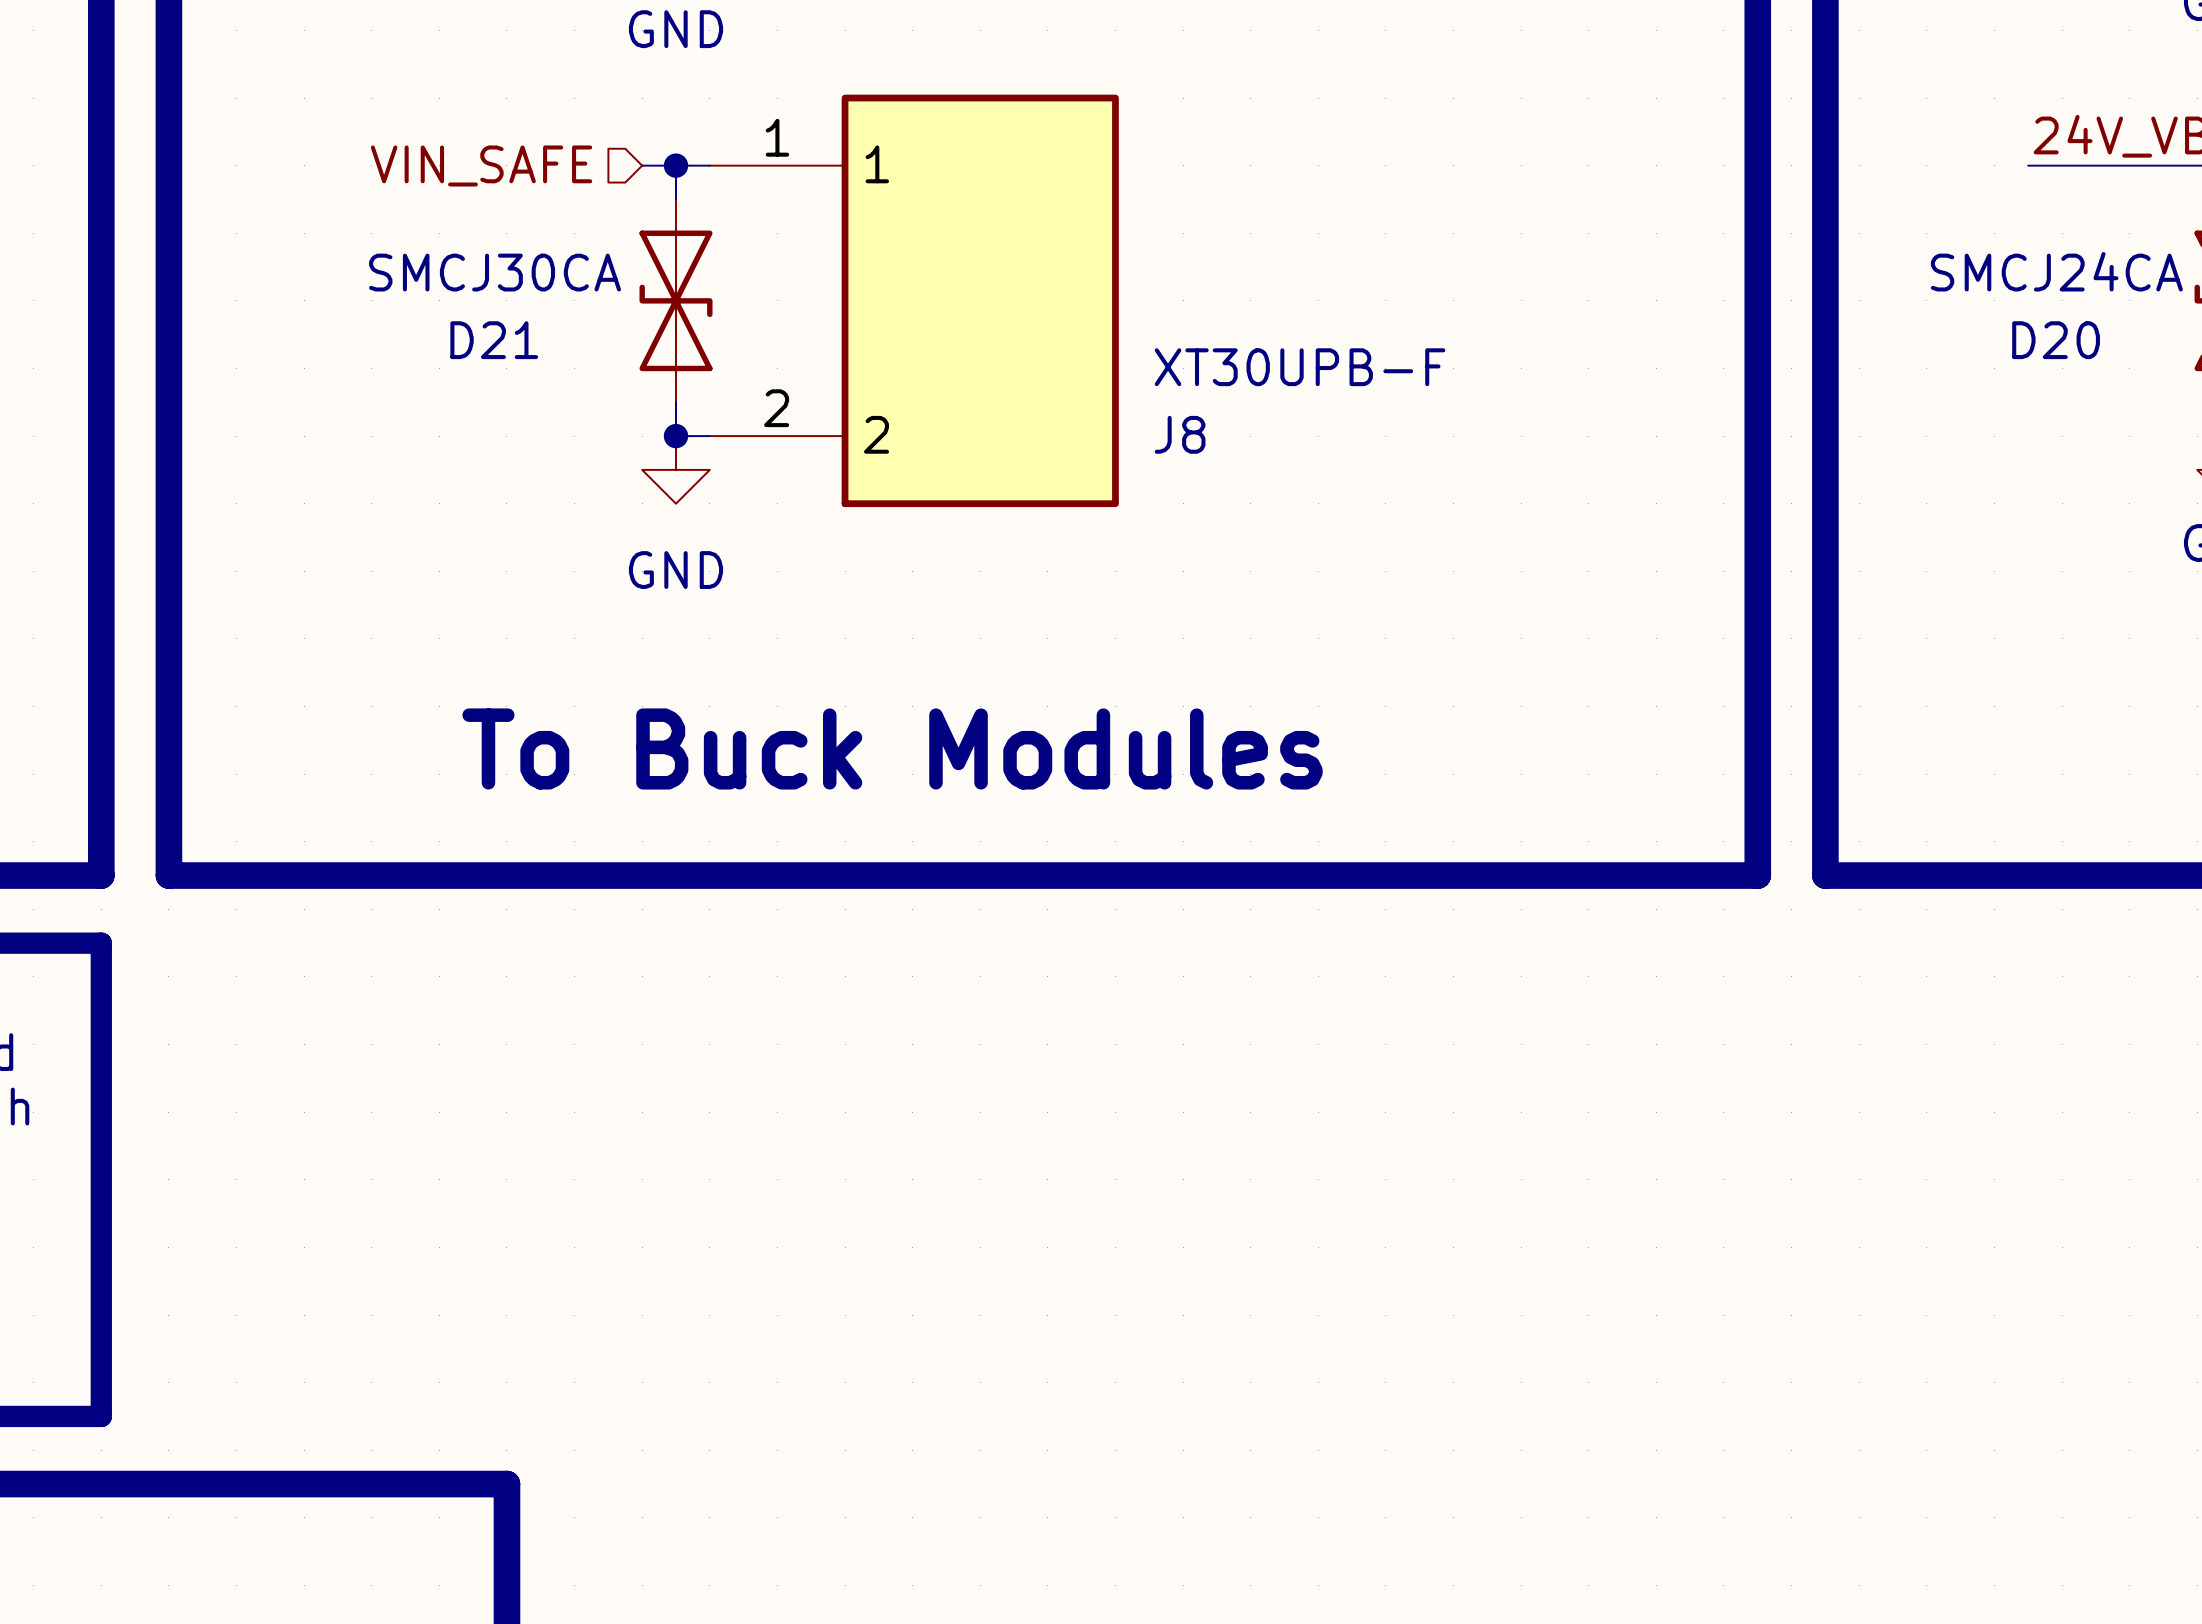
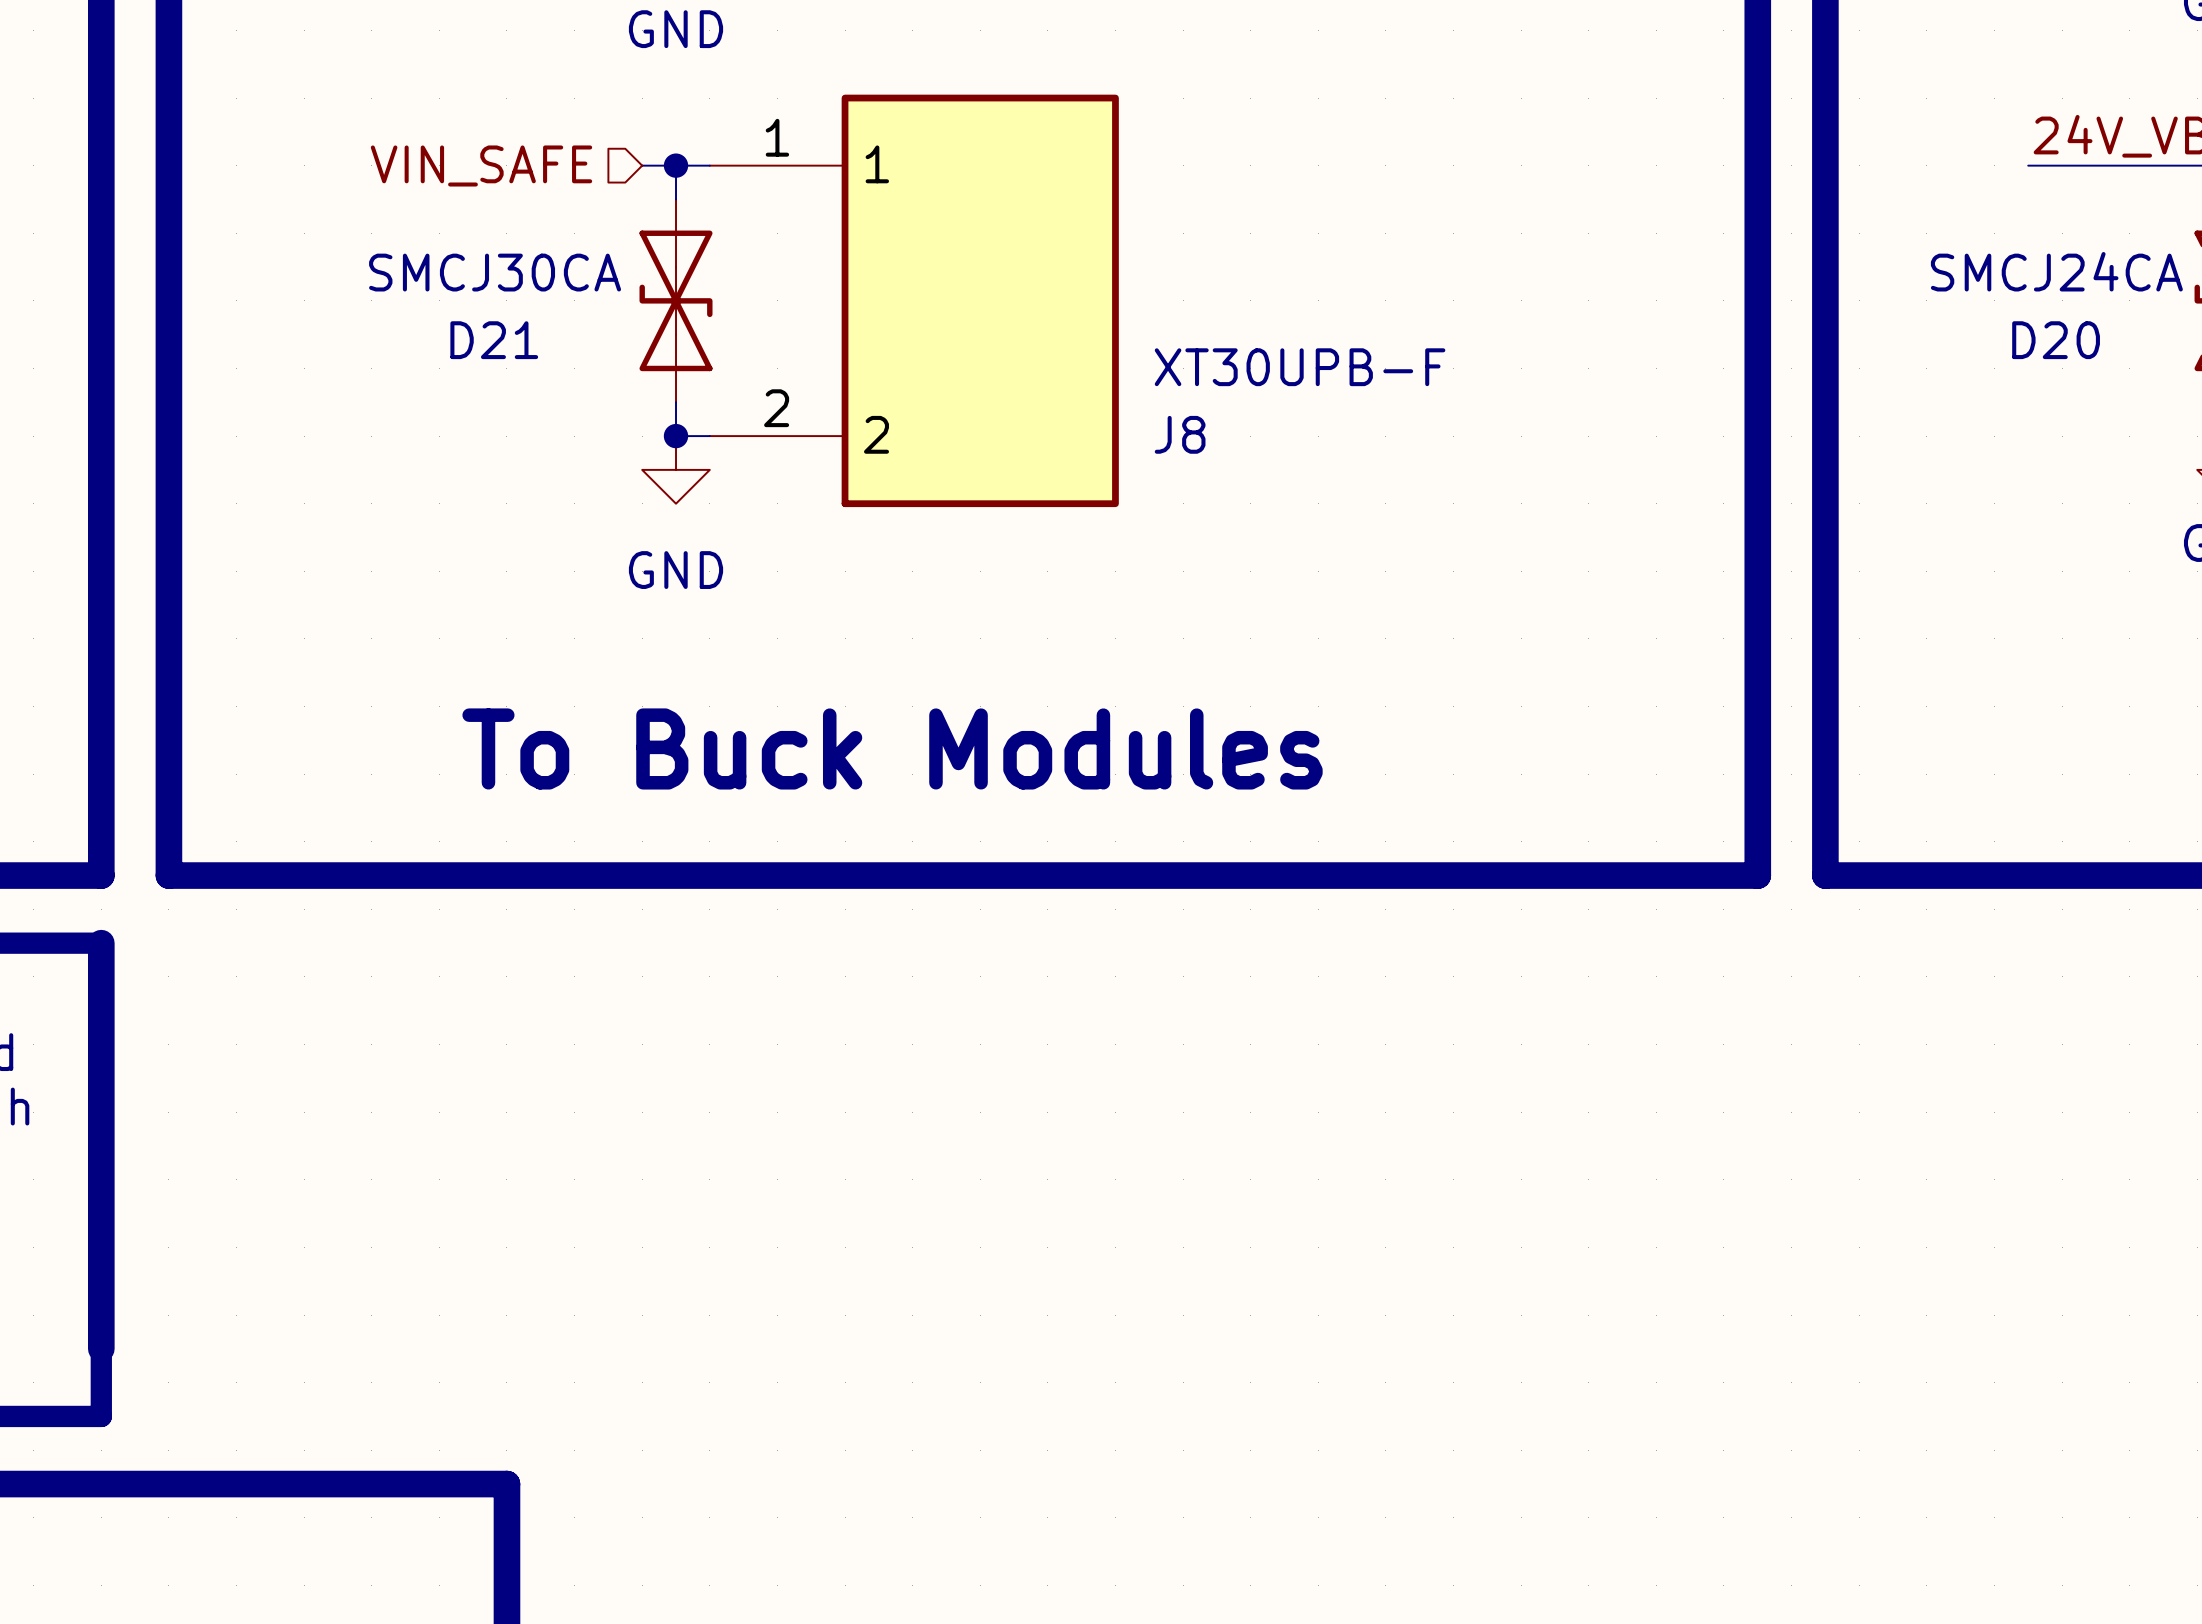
line width: thin (101, 943) (101, 1348) -> thick (101, 943) (101, 1348)

